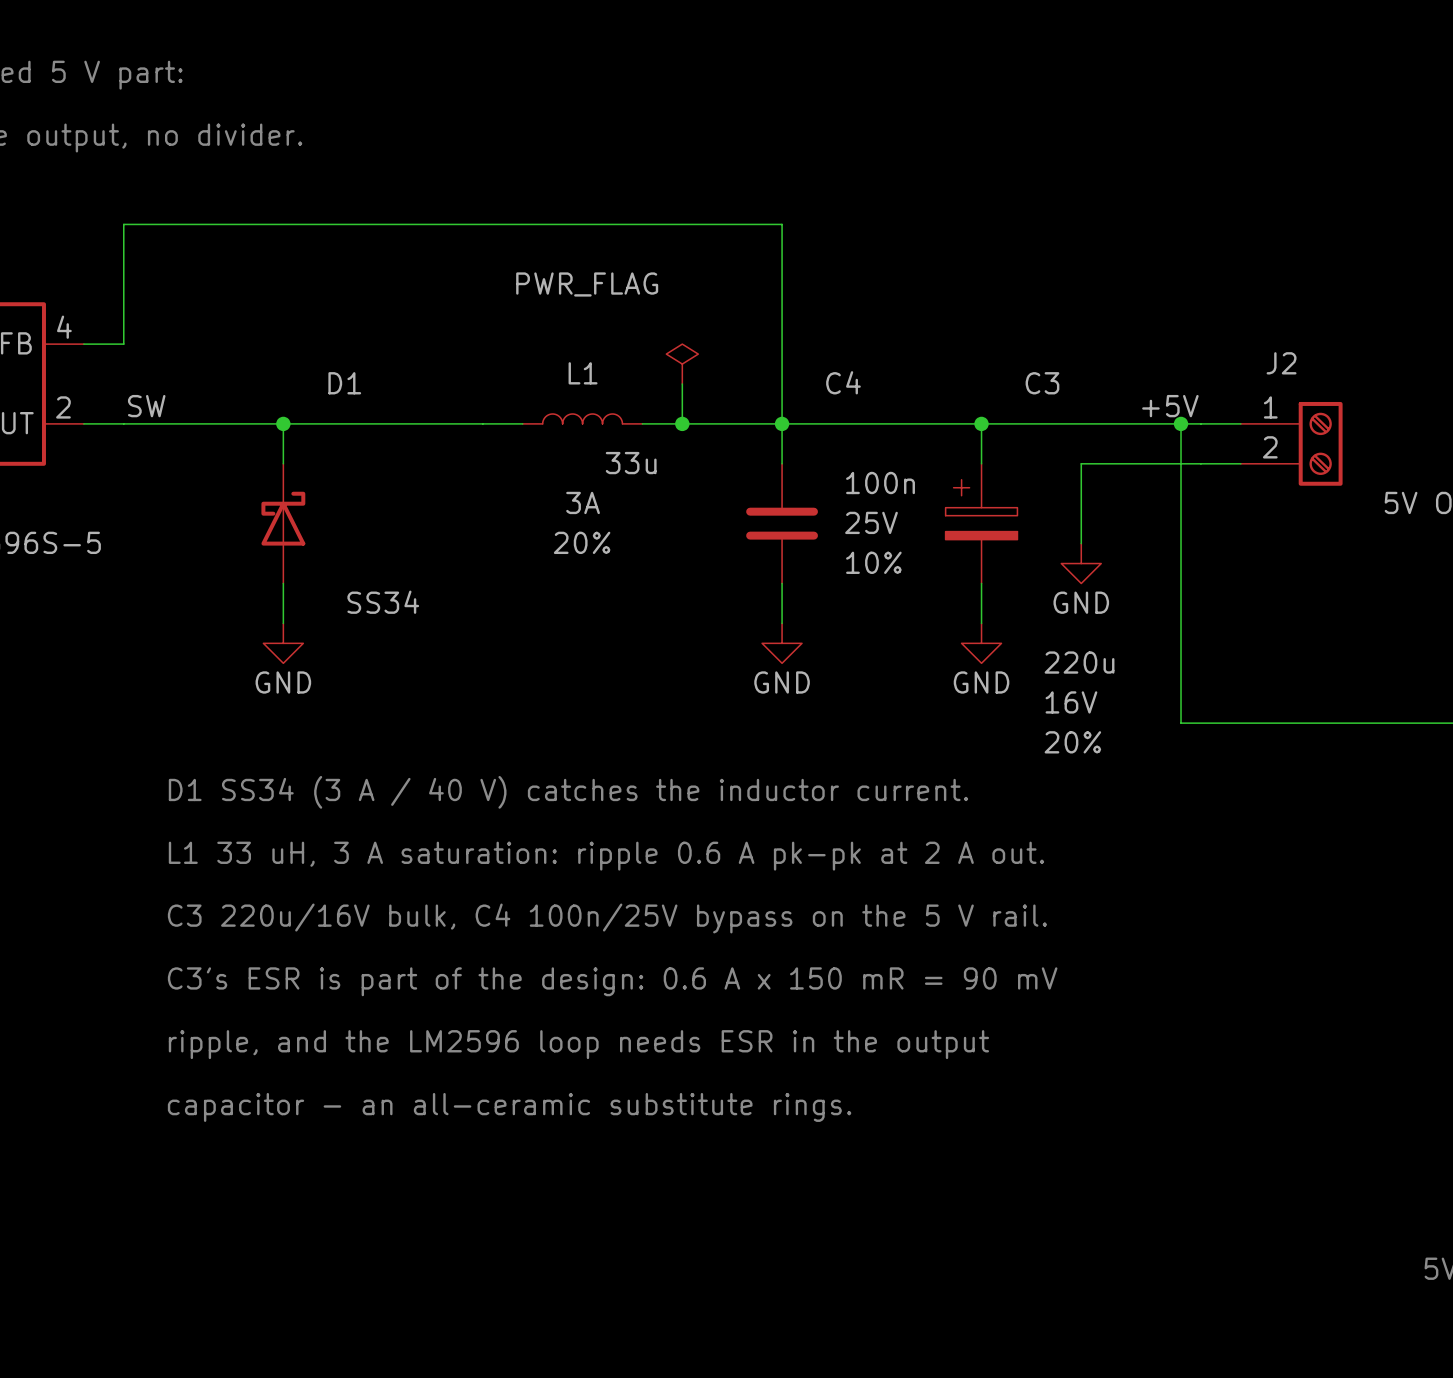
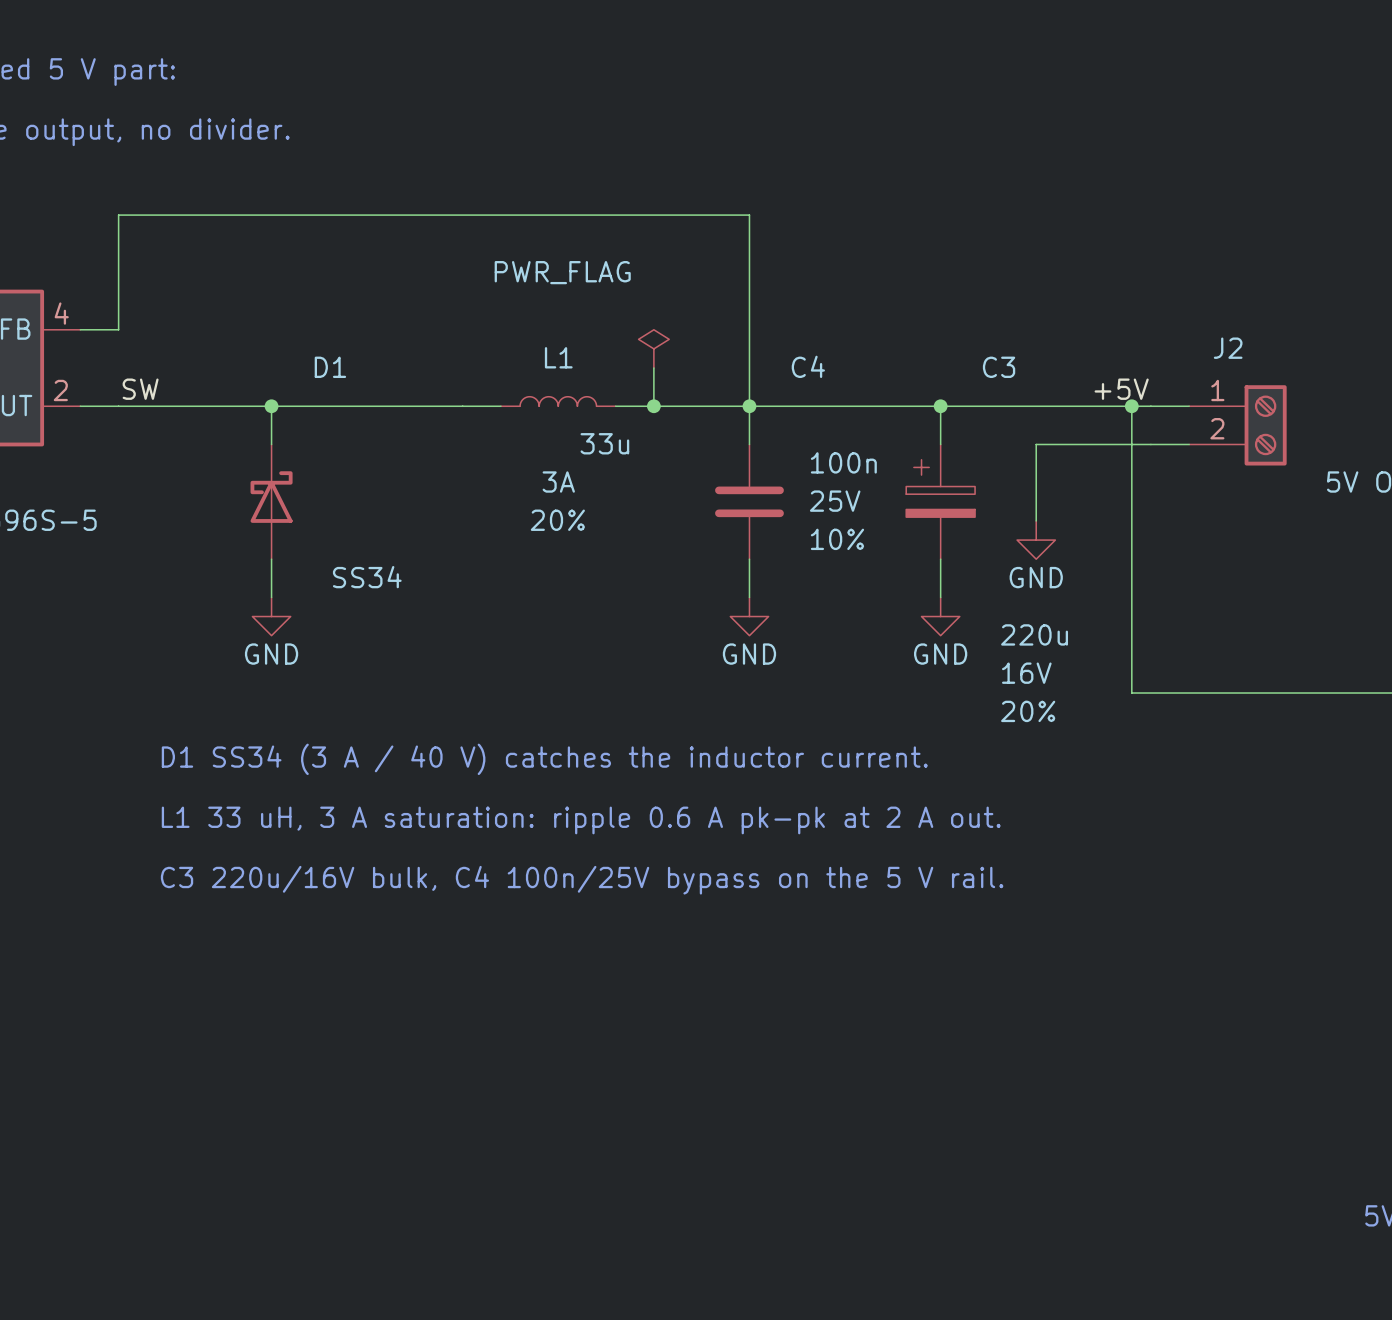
text: C3's ESR is part of the design: 0.6 A x 150 mR = 90 mV (612, 981) -> none
text: ripple, and the LM2596 loop needs ESR in the output (578, 1044) -> none
text: capacitor - an all-ceramic substitute rings. (509, 1107) -> none

